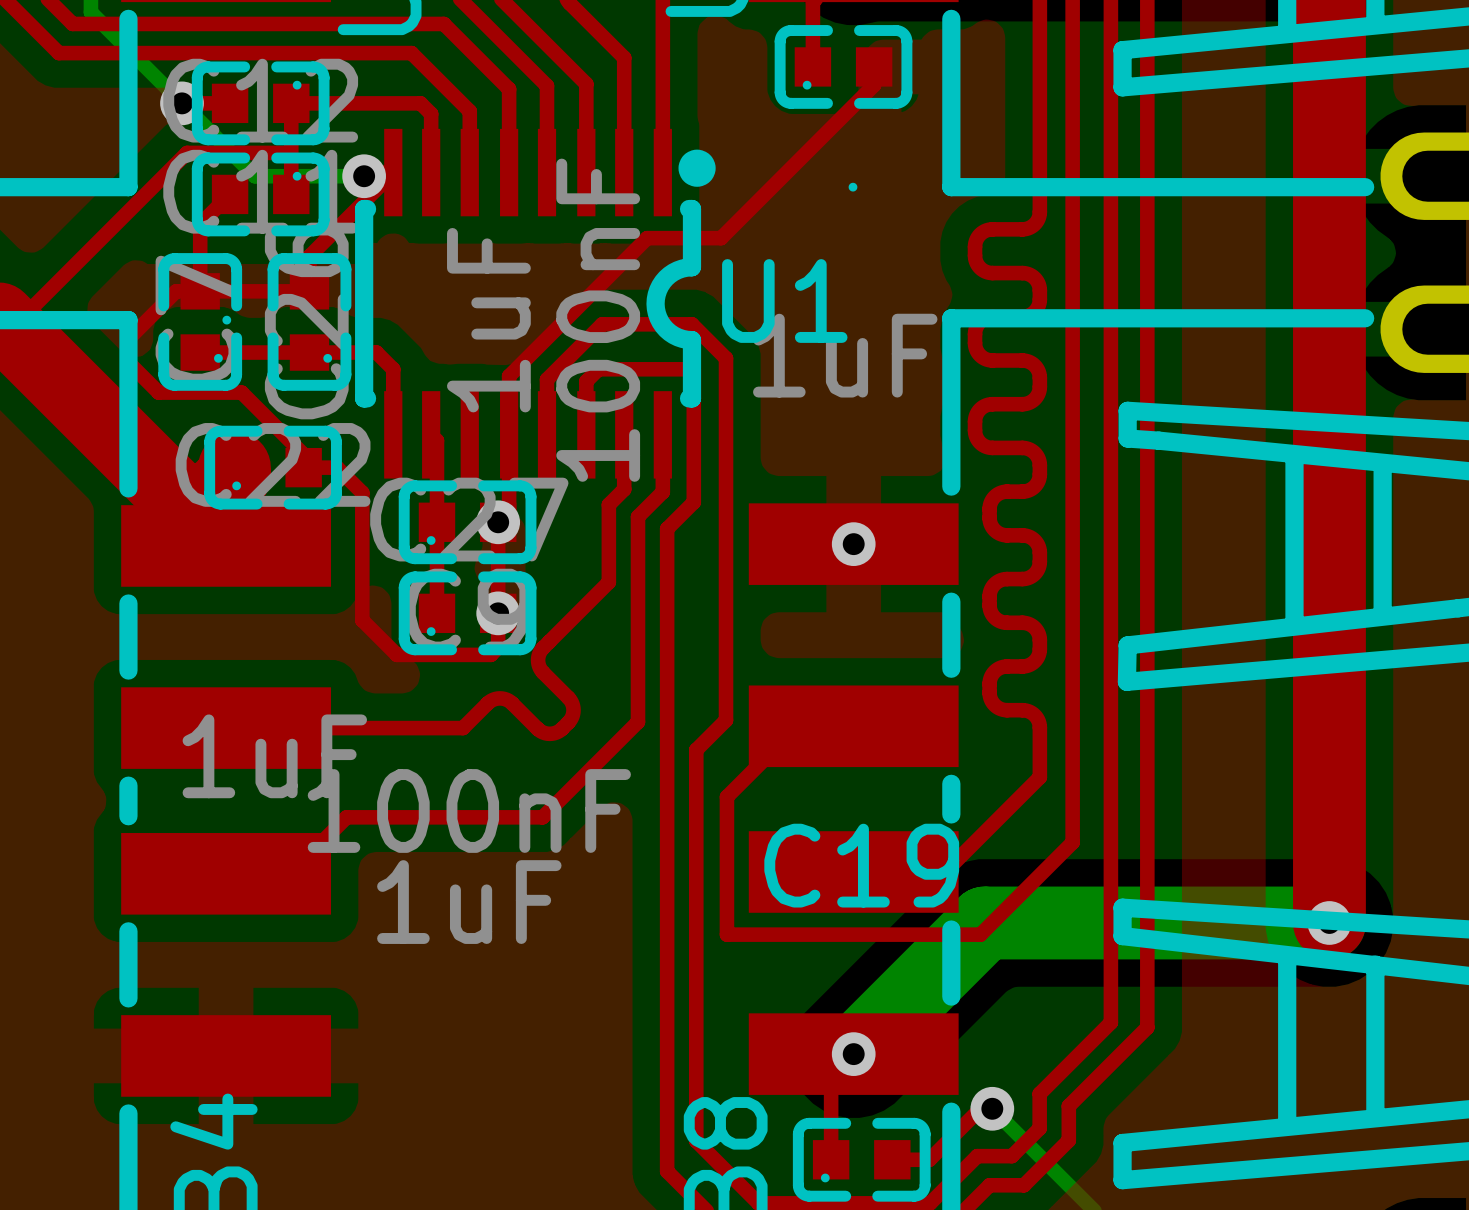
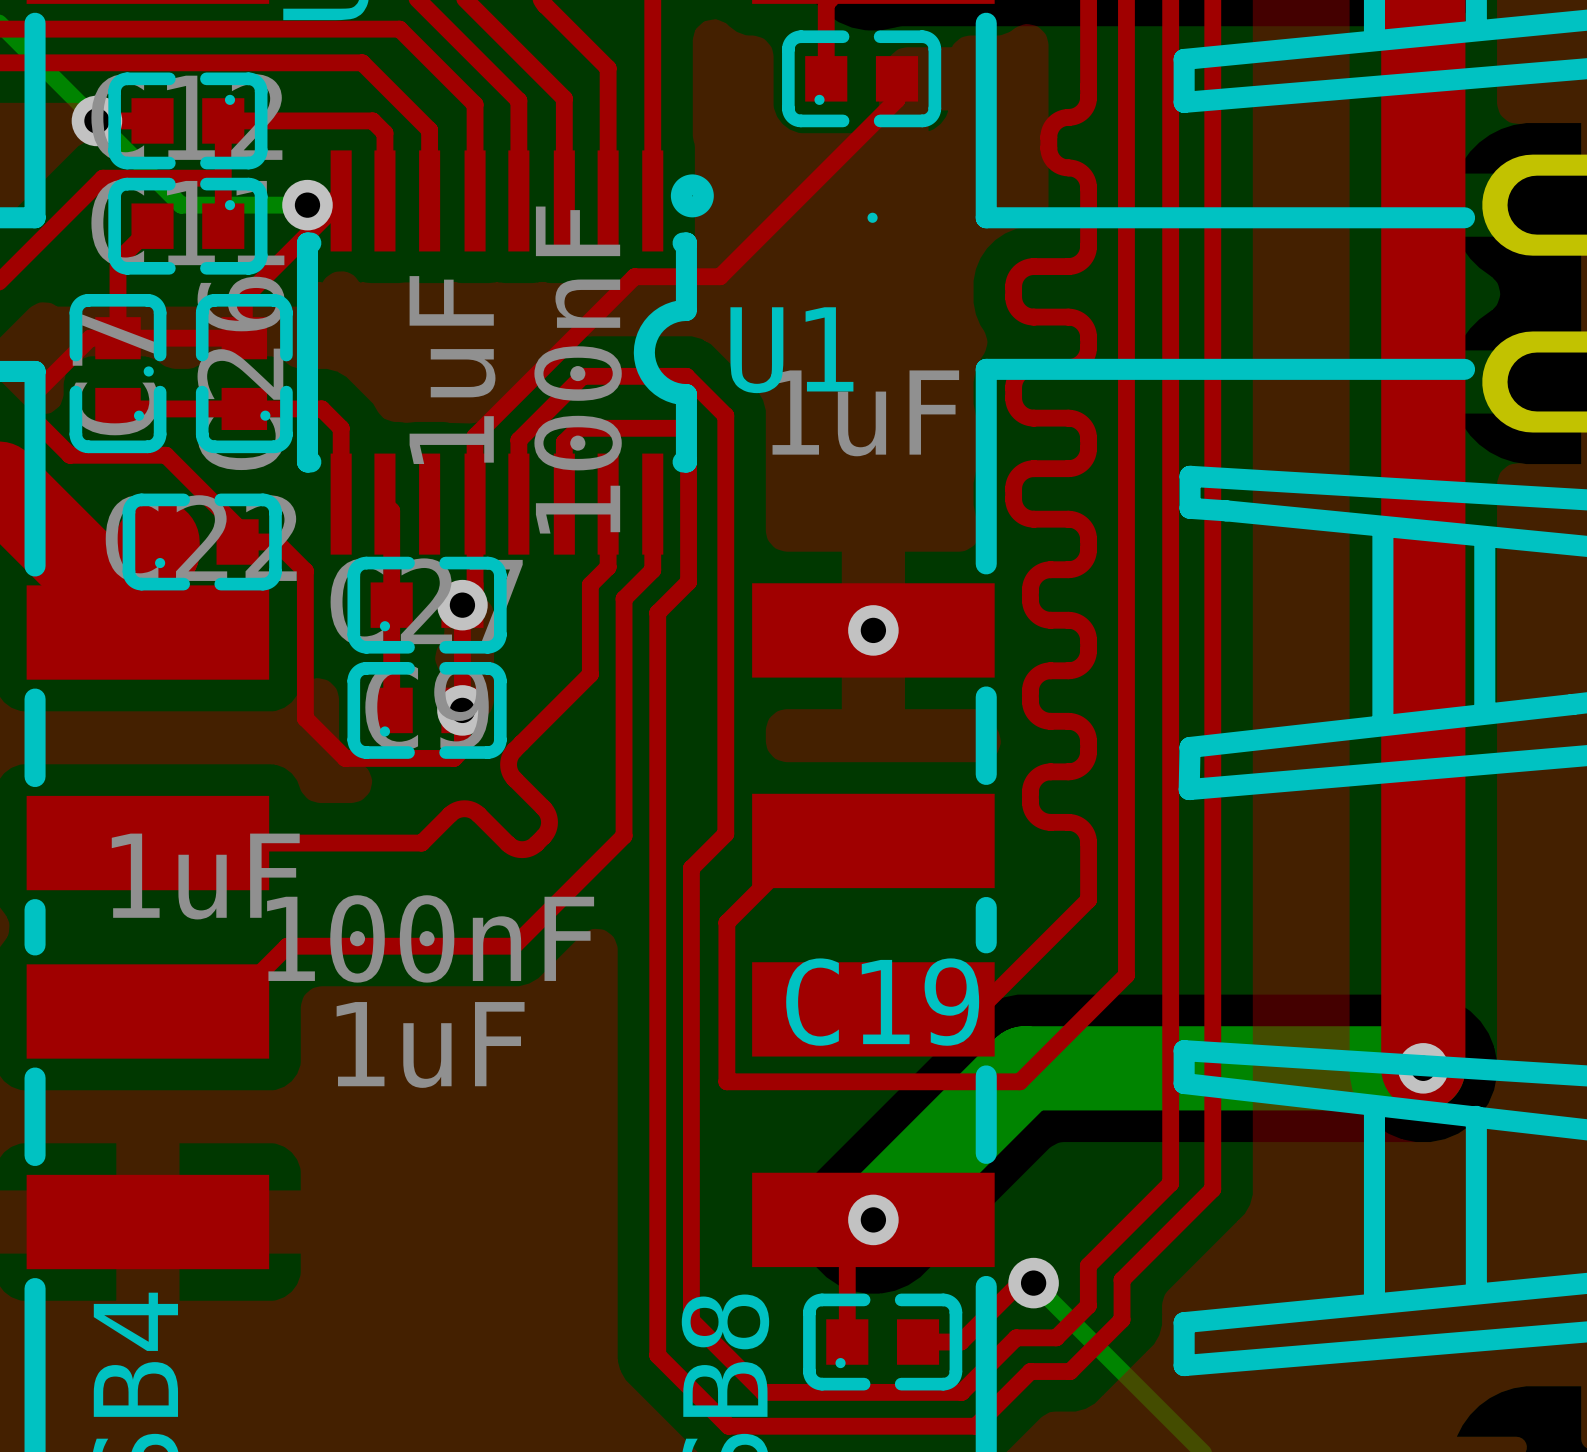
top track: (1039, 83) (1039, 161) -> (1088, 97) (1085, 107) (1080, 113) (1061, 118) (1054, 123) (1050, 129) (1048, 137) (1048, 150) (1052, 160) (1061, 166) (1080, 172) (1087, 180) (1088, 187)

